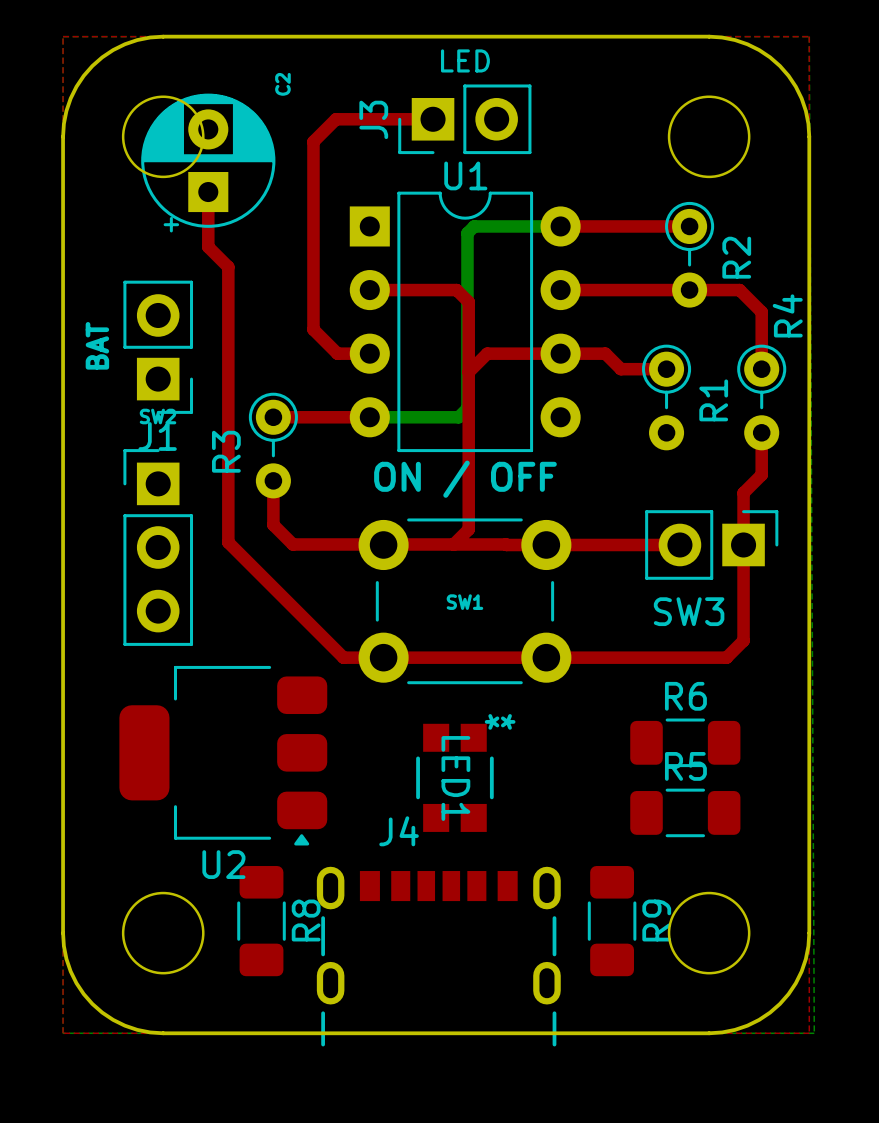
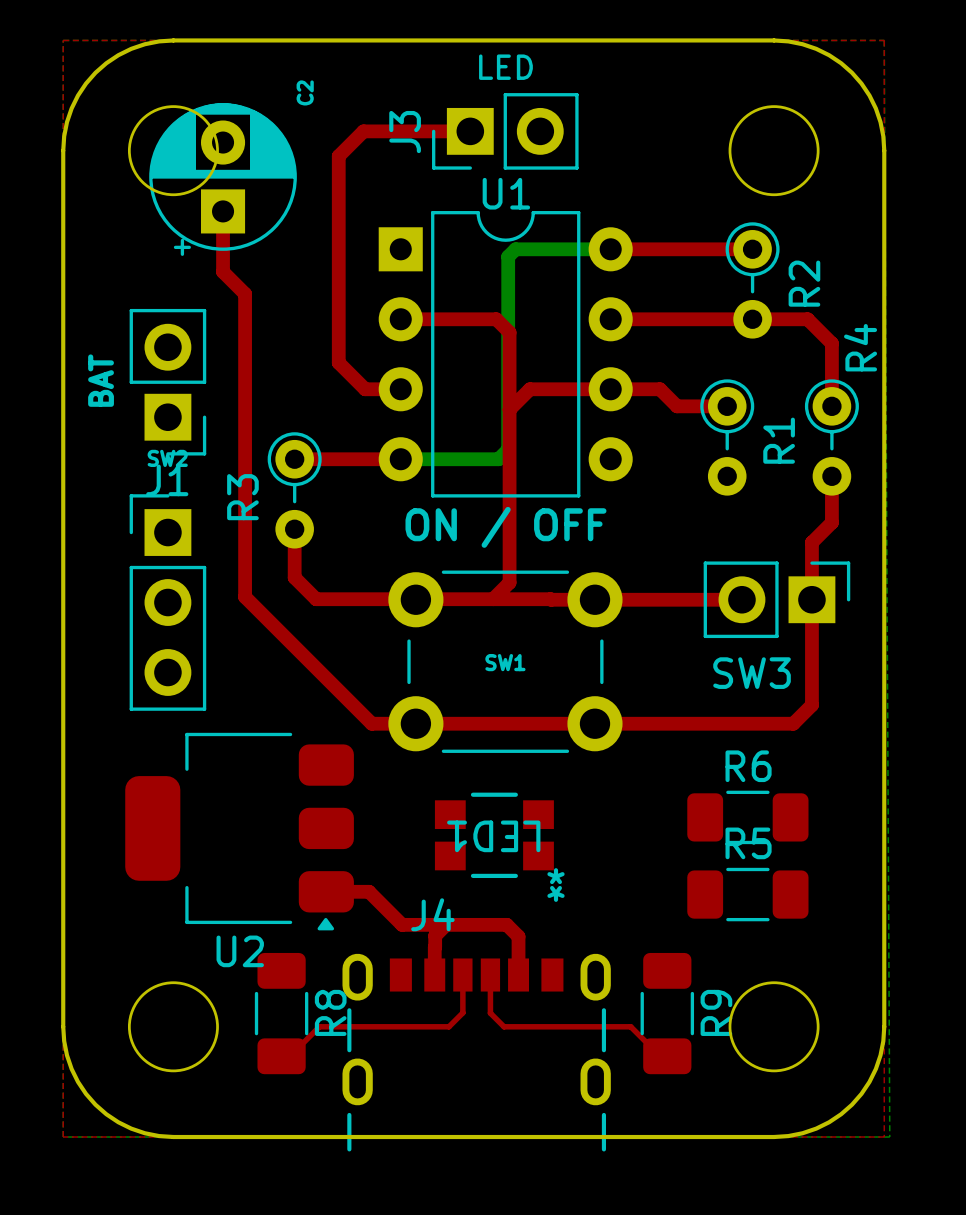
LED1 rotation: 0° (454, 777) -> 90° clockwise (494, 835)
top track: none -> (326, 891) (369, 891) (402, 924) (506, 924) (518, 936) (518, 975)
top track: none -> (446, 924) (435, 935) (434, 975)
top track: none -> (462, 975) (462, 1012) (448, 1026) (319, 1026) (289, 1056) (281, 1056)
top track: none -> (490, 975) (490, 1013) (504, 1026) (630, 1026) (660, 1056) (667, 1056)

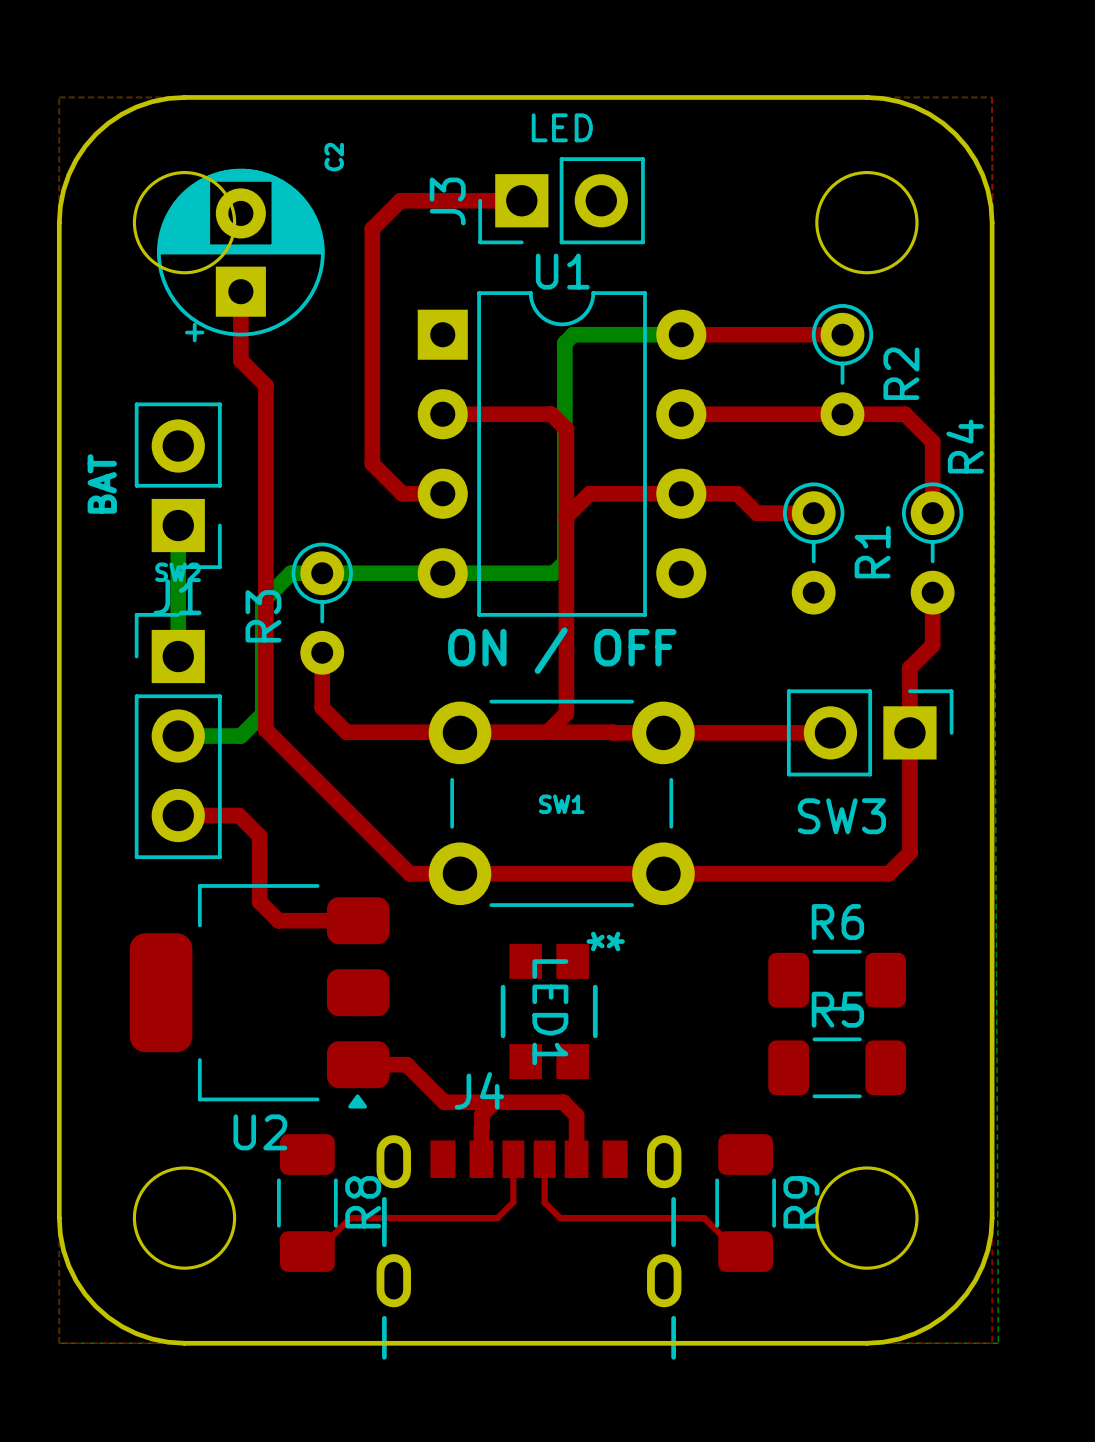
bottom track: none -> (178, 525) (178, 656)
top track: (294, 459) (402, 459) -> none
bottom track: none -> (442, 573) (290, 573) (262, 601) (262, 714) (240, 736) (178, 736)
top track: none -> (178, 815) (238, 815) (259, 836) (259, 901) (278, 920) (358, 920)
LED1 rotation: 0° (494, 835) -> 90° counterclockwise (549, 1011)

